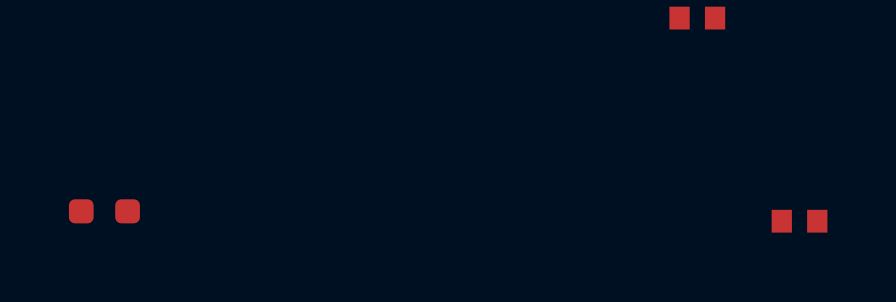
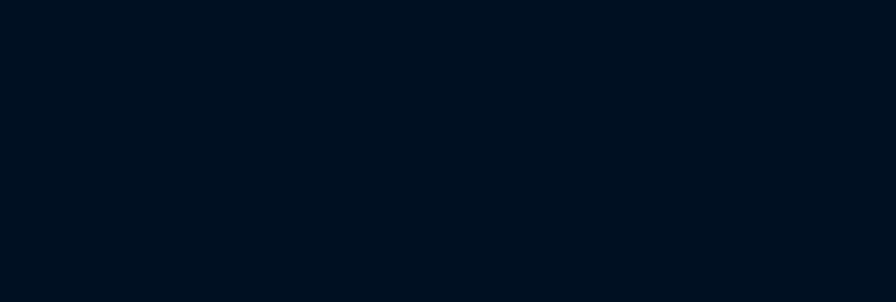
part: (697, 18) -> none
part: (104, 211) -> none
part: (799, 221) -> none

